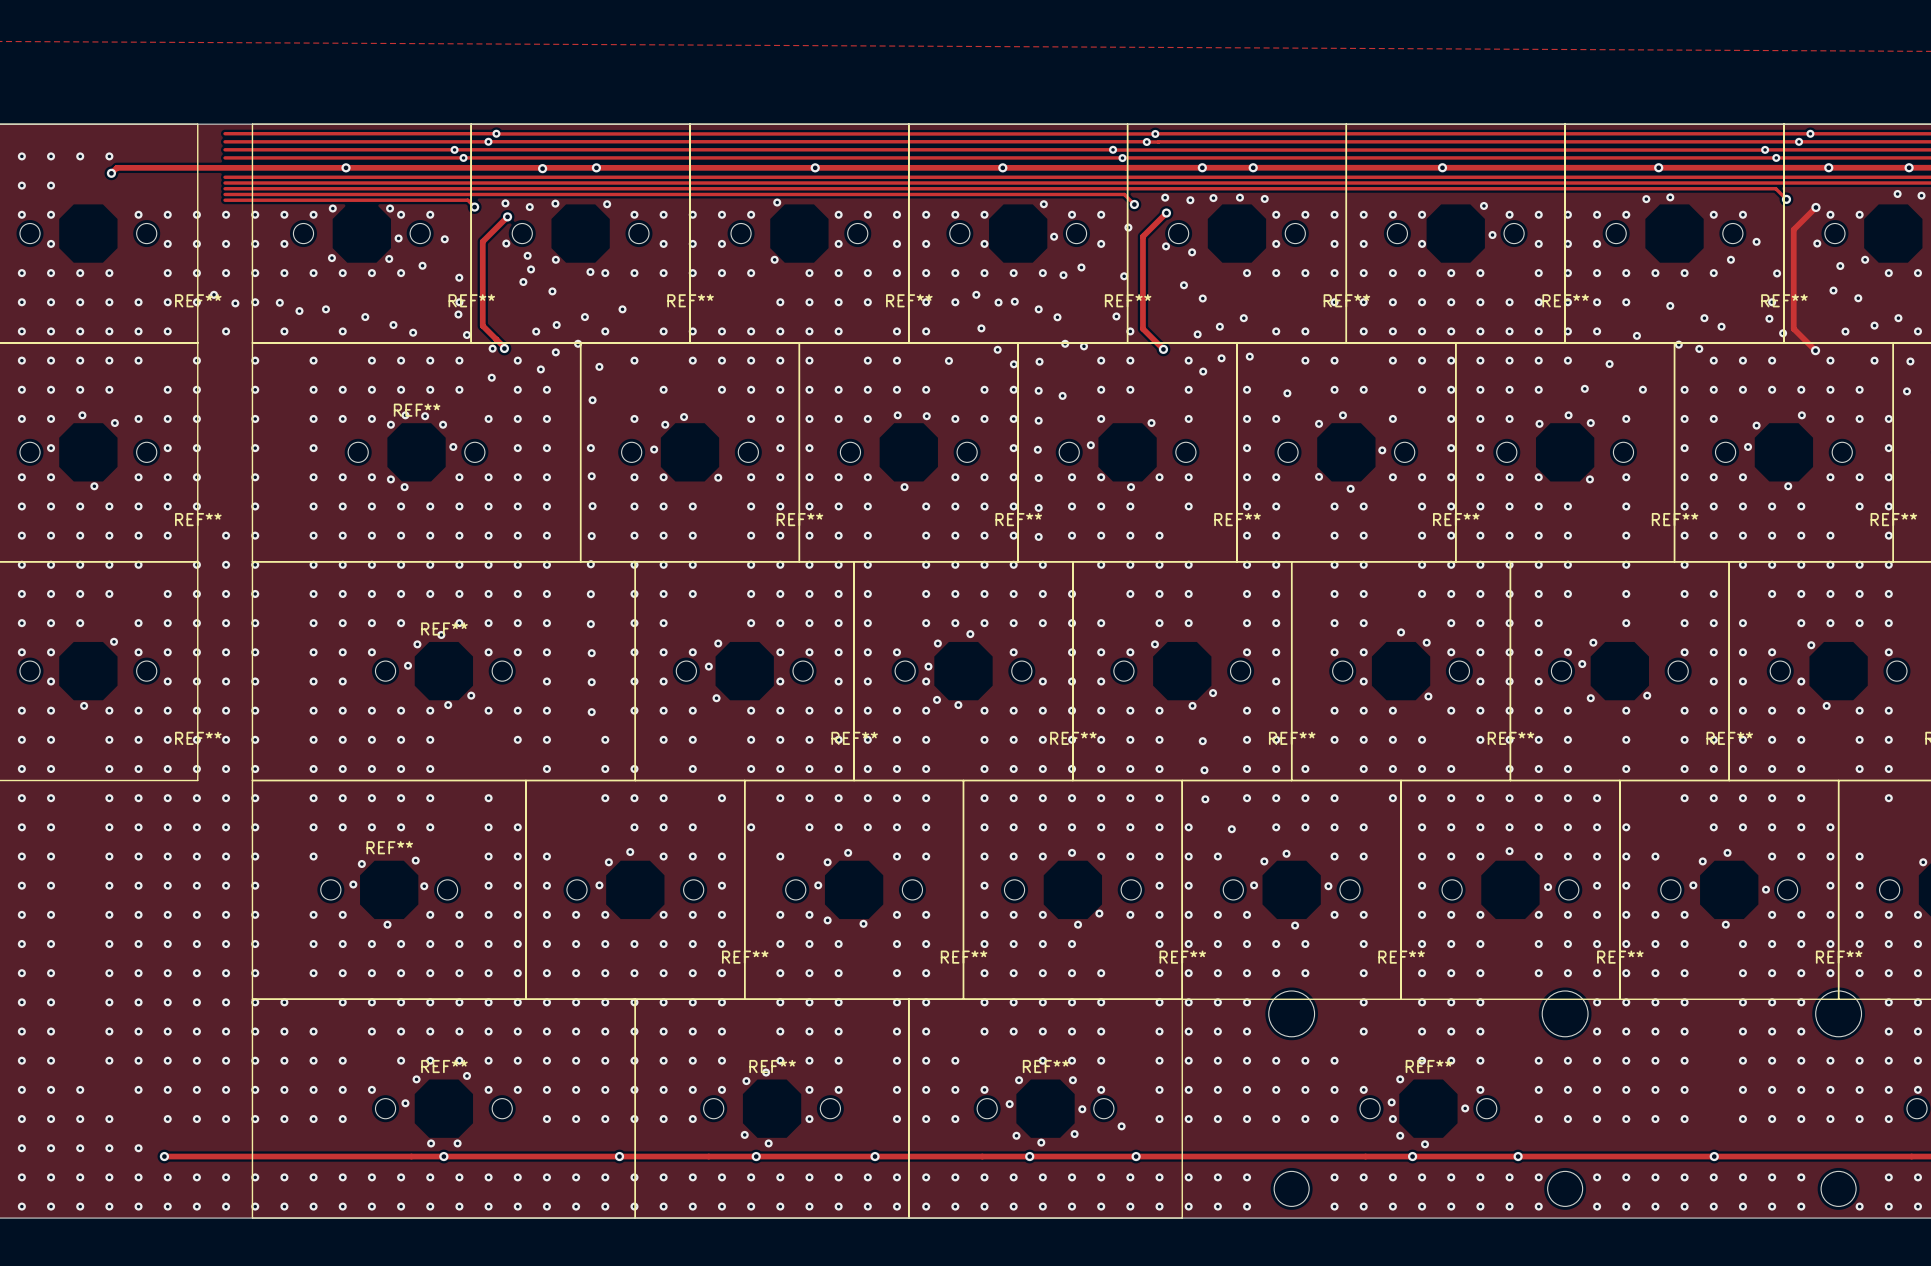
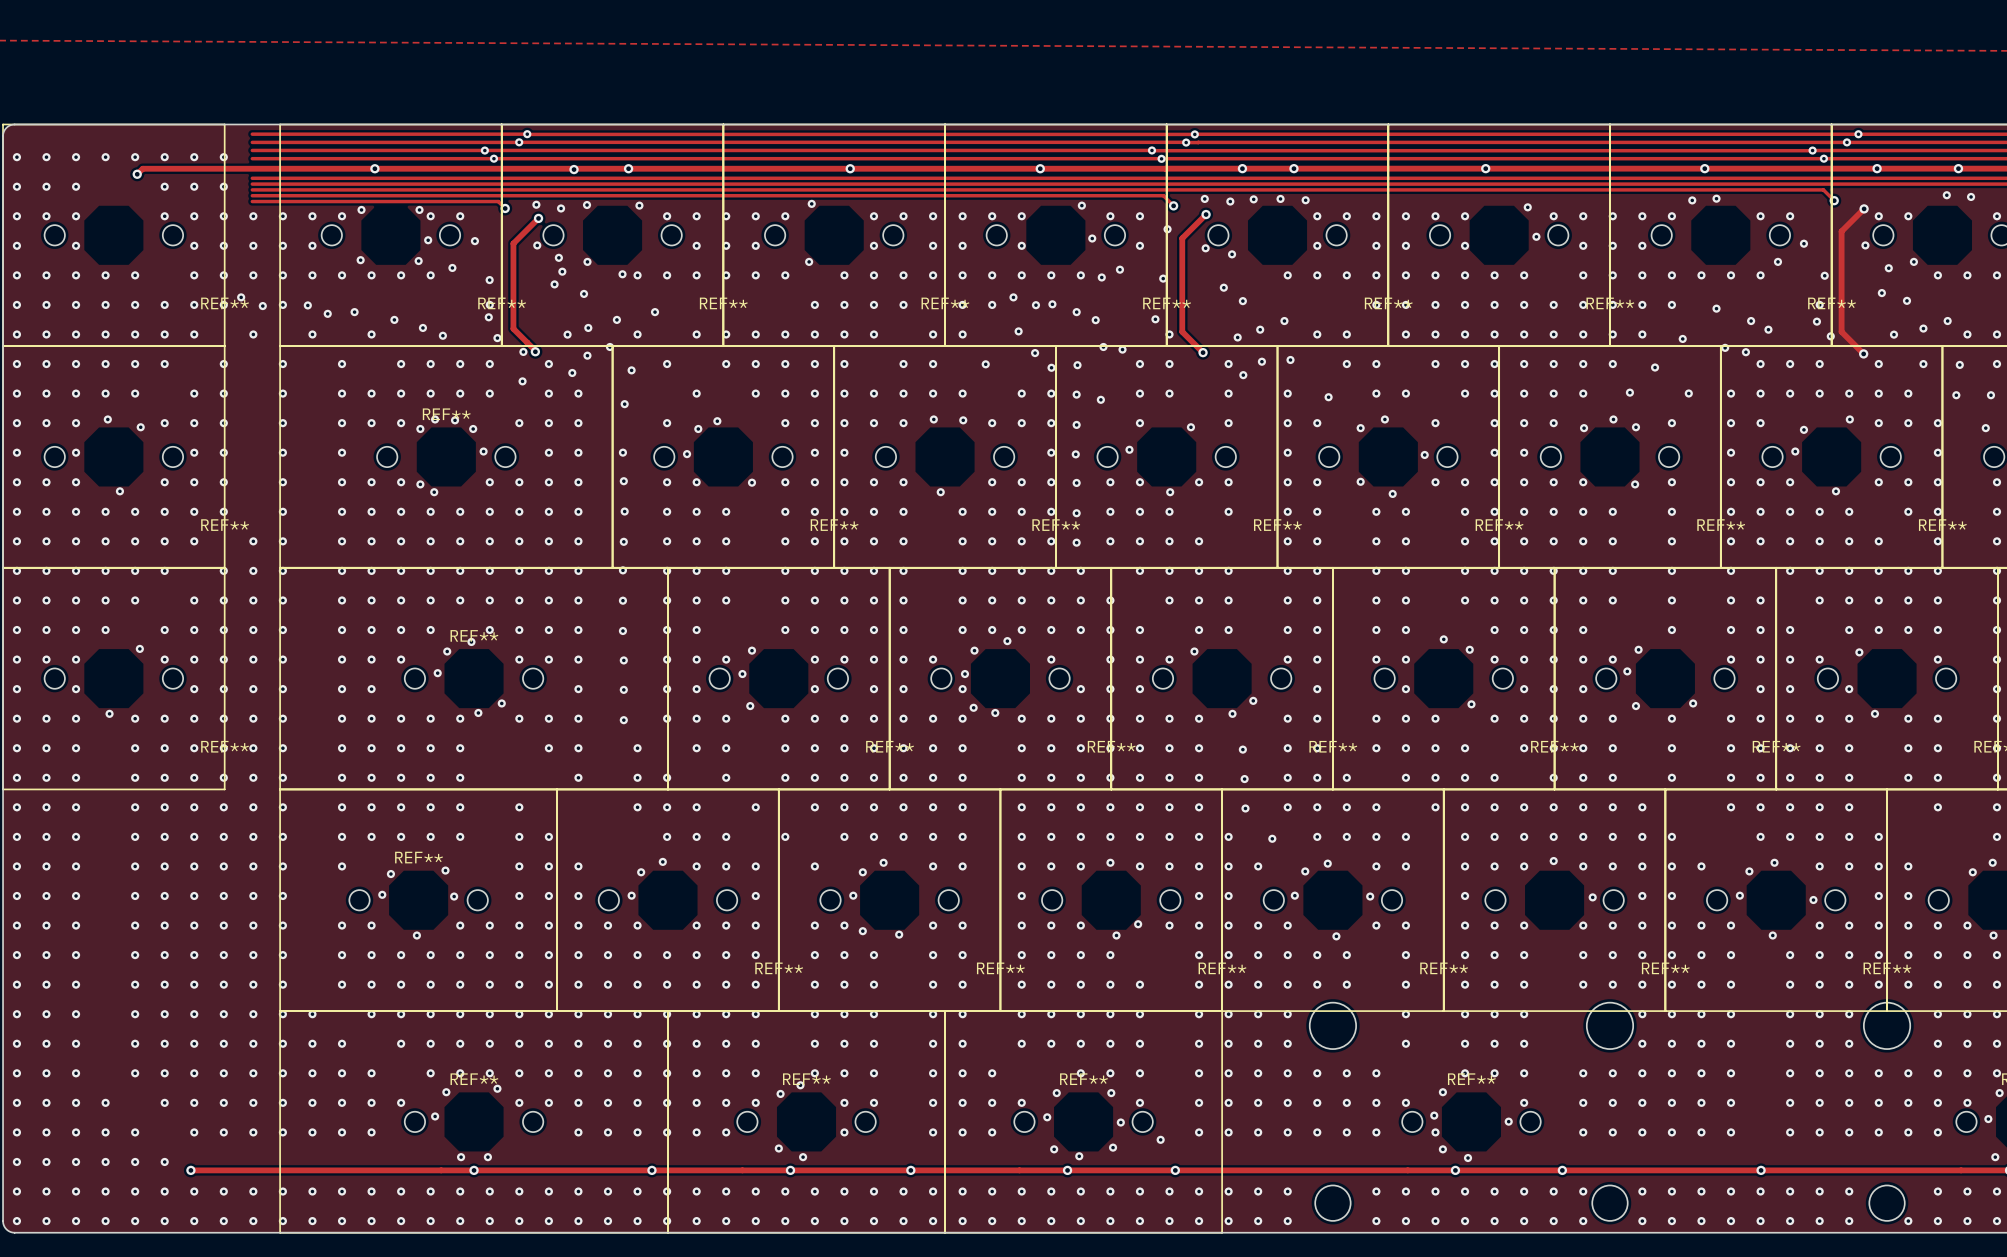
via: none -> (164, 157)
via: none -> (194, 157)
via: none -> (223, 157)
via: none -> (164, 186)
via: none -> (194, 186)
via: none -> (223, 186)

